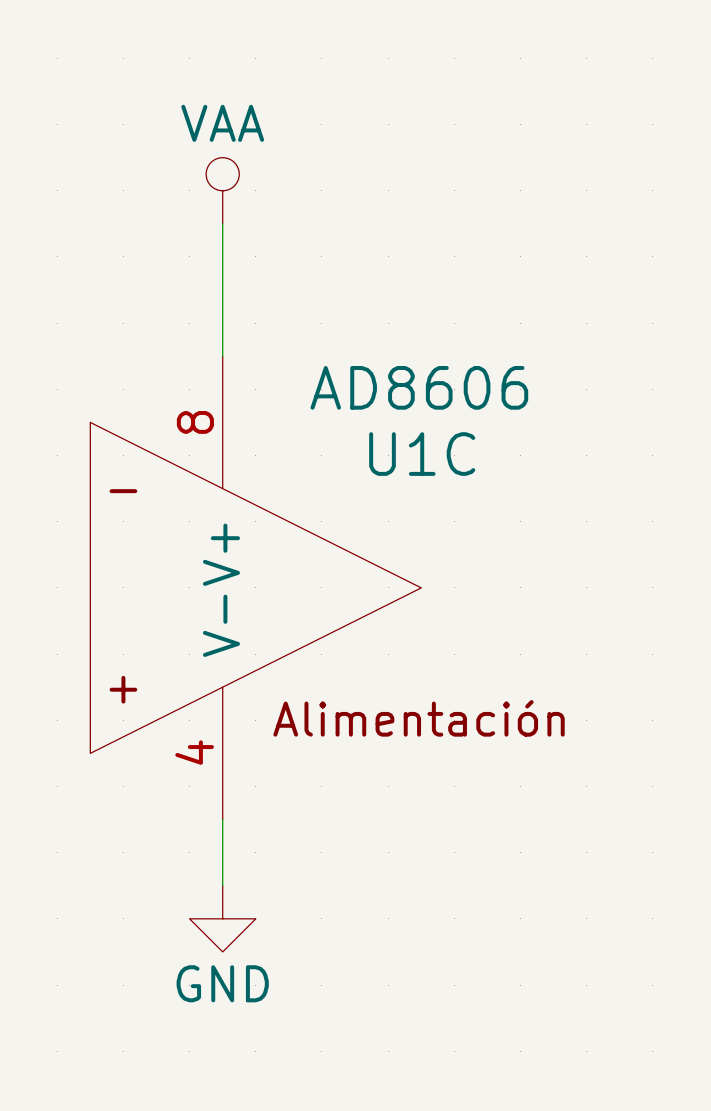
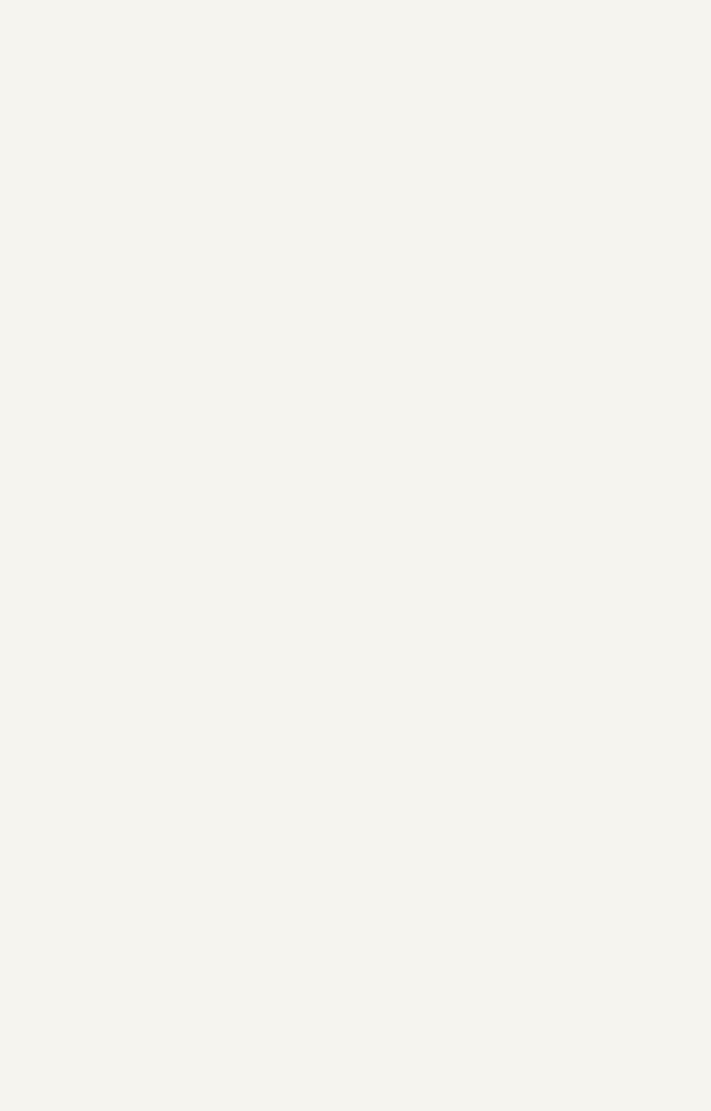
power symbol: VAA (222, 190) -> none
wire: (222, 223) (222, 356) -> none
U1C: AD8606 (255, 587) -> none
wire: (222, 819) (222, 885) -> none
power symbol: GND (222, 918) -> none

